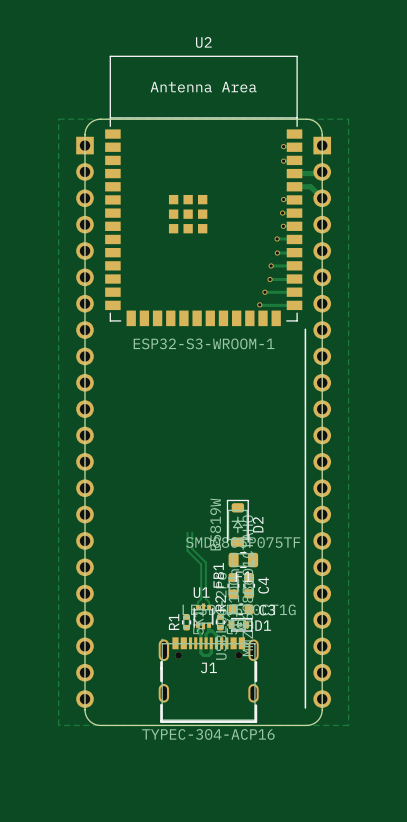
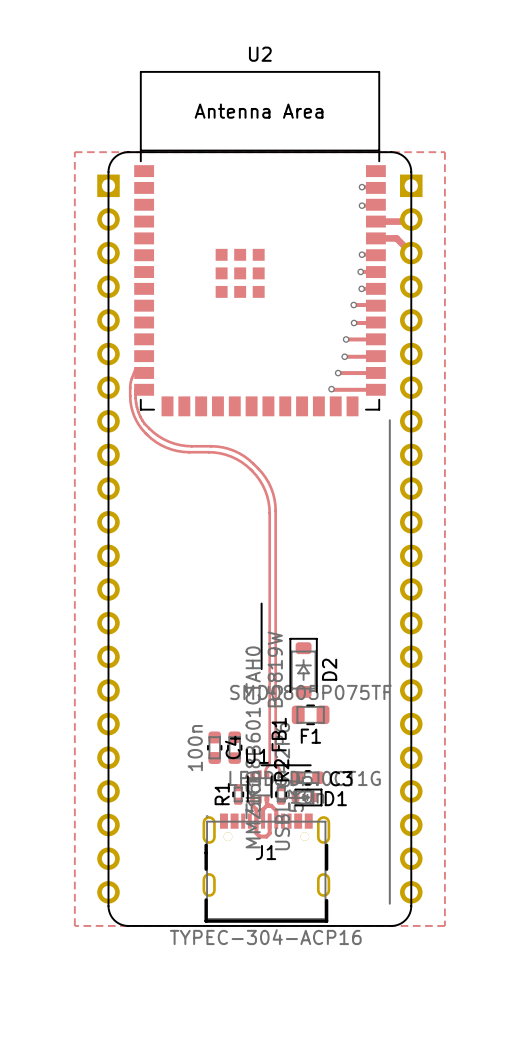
track: none -> (135, 368) (130, 385) (131, 406) (136, 420) (147, 434) (161, 445) (171, 449) (183, 451) (214, 452) (236, 459) (256, 475) (267, 495) (269, 513) (269, 762) (265, 775)
track: none -> (144, 389) (135, 389) (136, 407) (144, 423) (153, 432) (168, 441) (180, 445) (217, 446) (239, 453) (262, 472) (273, 493) (275, 510) (275, 762) (279, 775)
line: (305, 329) (305, 708) -> none
line: none -> (389, 420) (389, 903)
U2 value: ESP32-S3-WROOM-1 (204, 343) -> none
line: none -> (261, 603) (261, 669)
track: (187, 532) (187, 550) (201, 564) (201, 599) (197, 602) (197, 607) -> none
track: (192, 532) (192, 548) (205, 562) (205, 598) (209, 602) (209, 607) -> none
FB1 position: (233, 585) -> (234, 747)
C4 position: (249, 585) -> (214, 747)
line: none -> (261, 765) (310, 765)

